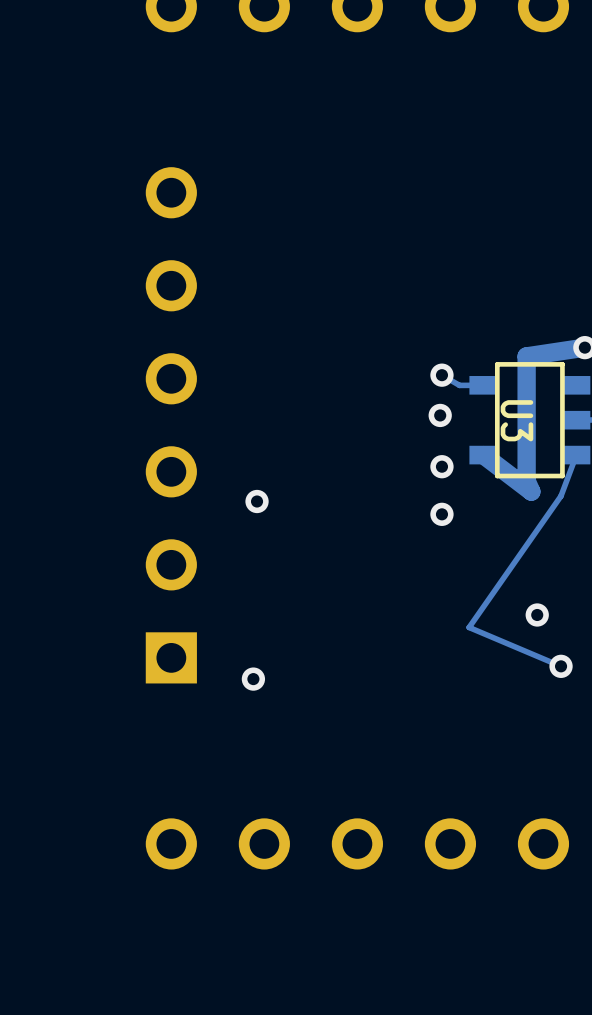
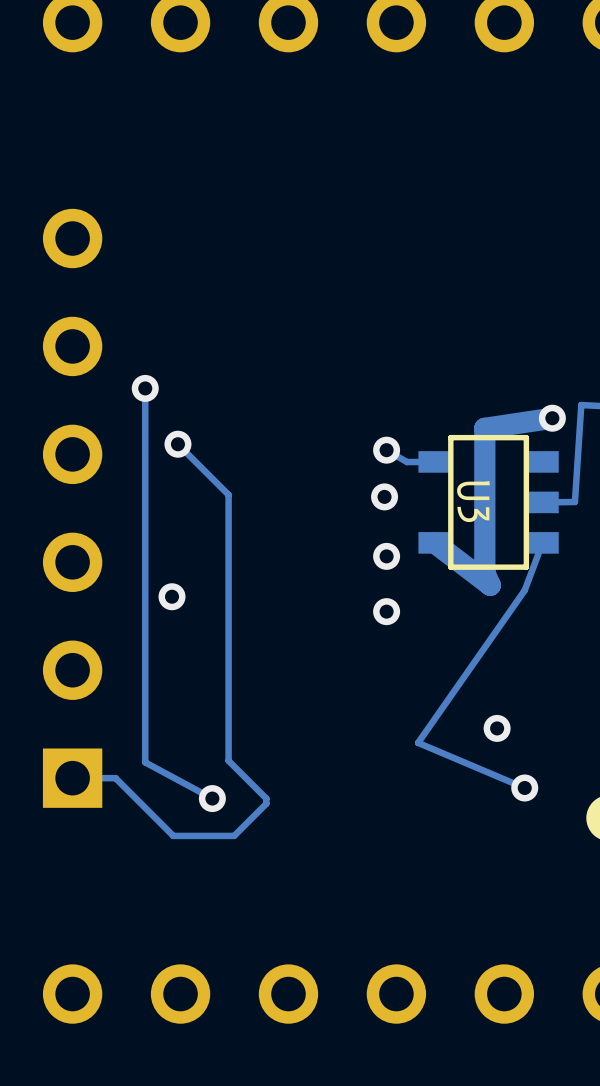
track: none -> (145, 388) (145, 762) (212, 798)
via: none -> (145, 388)
track: none -> (177, 444) (228, 494) (228, 760) (266, 798) (266, 803) (234, 835) (173, 835) (115, 778) (72, 778)
via: none -> (177, 444)
via position: (253, 679) -> (212, 798)

